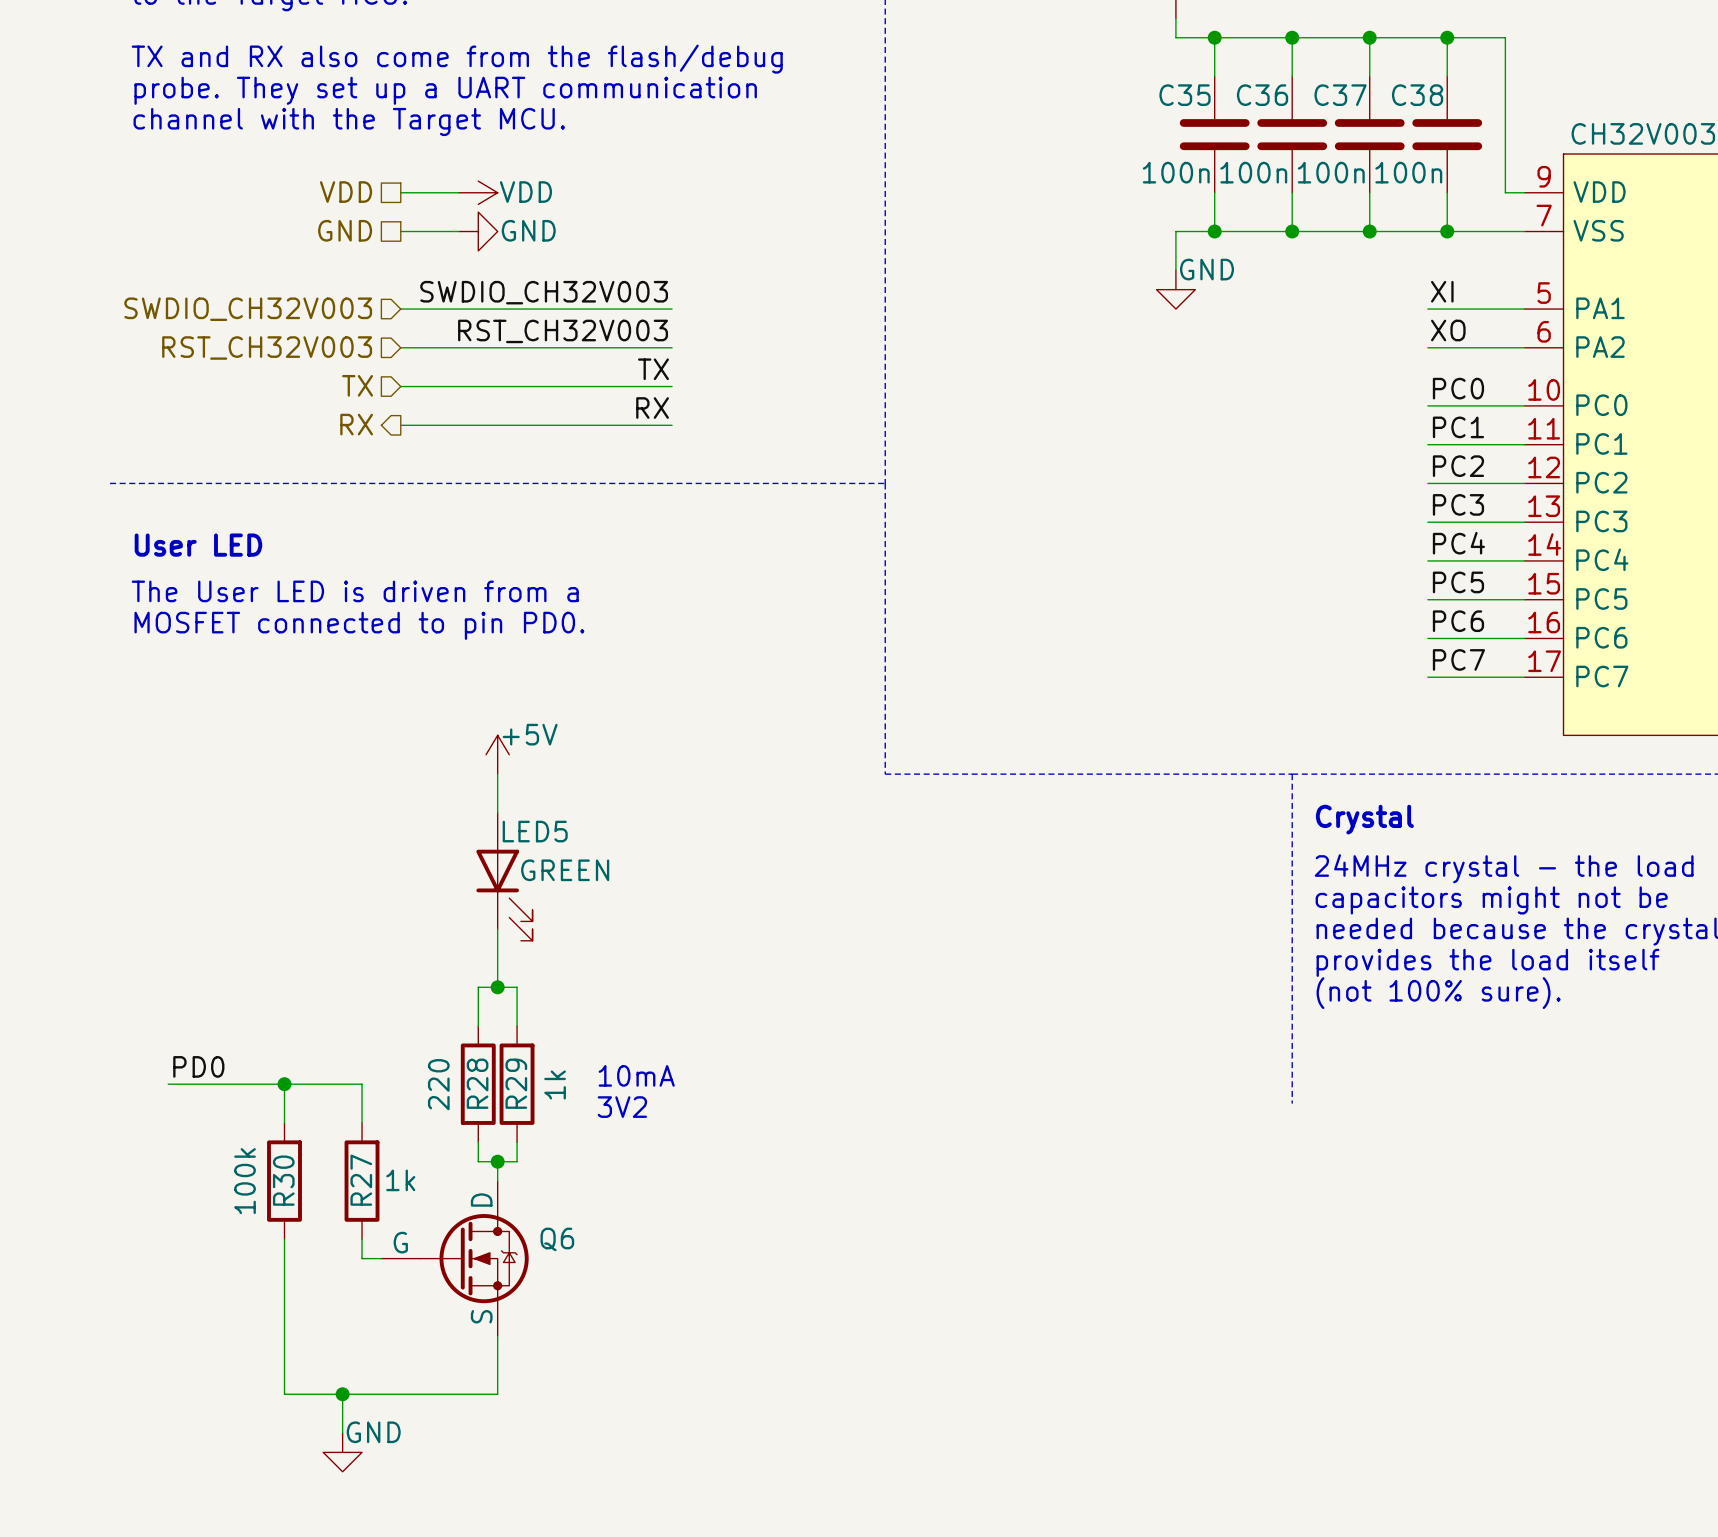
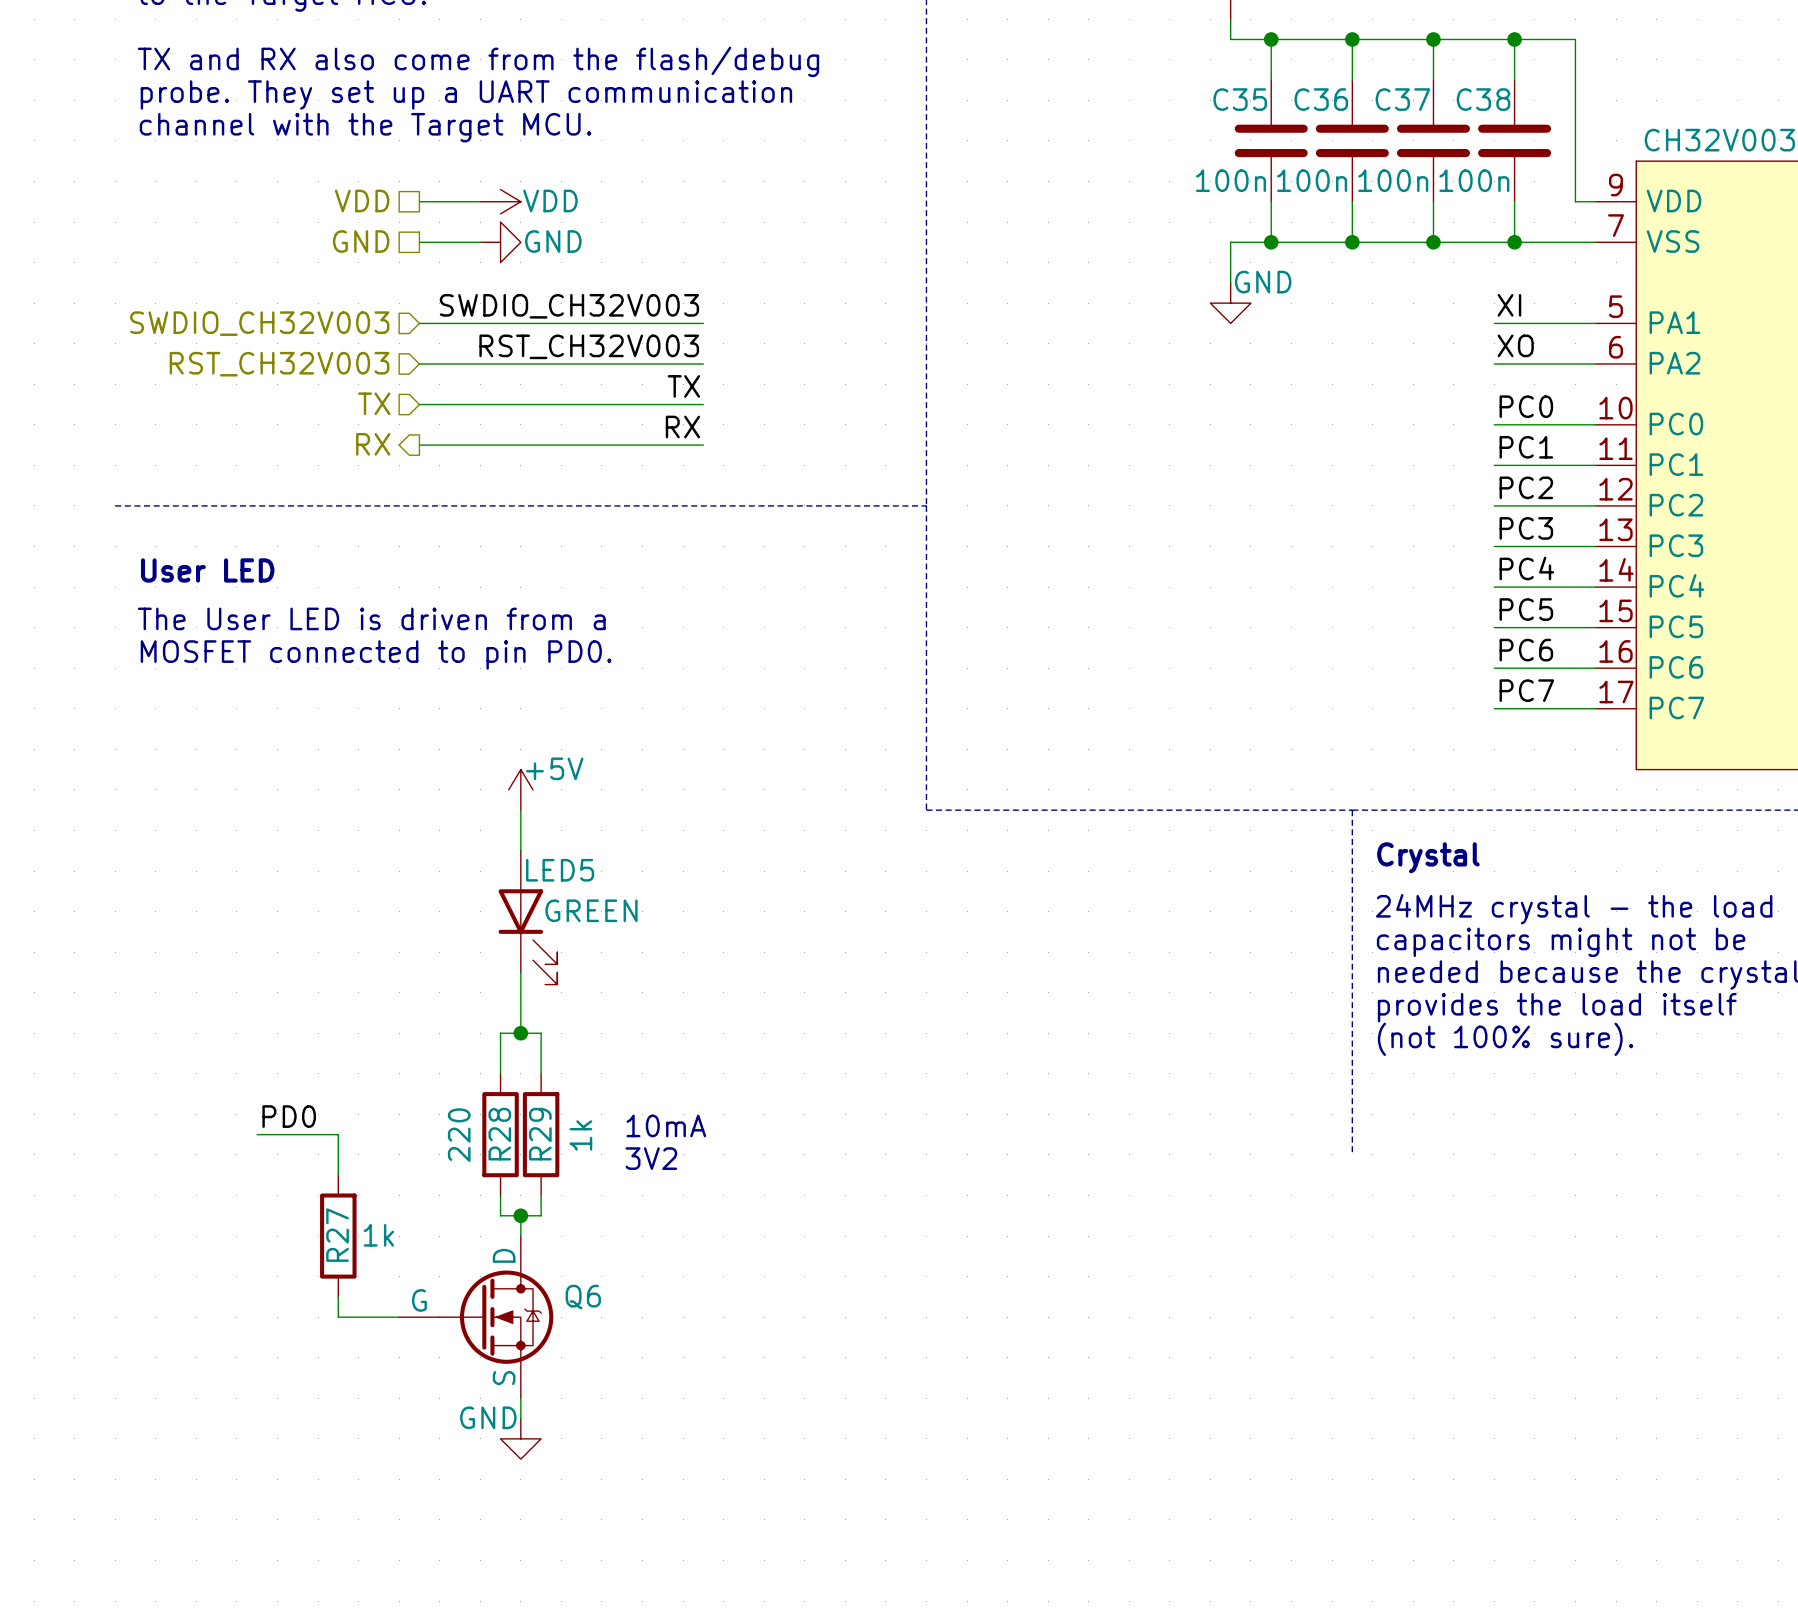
label position: PD0 (198, 1066) -> PD0 (289, 1116)
wire: (168, 1084) (245, 1084) -> none
wire: (284, 1084) (284, 1122) -> none
junction: (284, 1084) -> none
wire: (323, 1084) (362, 1084) (362, 1122) -> (338, 1134) (338, 1175)
R30: 100k (284, 1181) -> none
R27 position: (362, 1181) -> (338, 1236)
wire: (284, 1239) (284, 1394) (497, 1394) (497, 1355) -> none
wire: (362, 1239) (362, 1258) -> (338, 1296) (338, 1317) (378, 1317)
wire: (342, 1394) (342, 1433) -> none
junction: (342, 1394) -> none
power symbol text position: GND (373, 1432) -> GND (488, 1417)
power symbol position: GND (342, 1452) -> GND (520, 1438)

